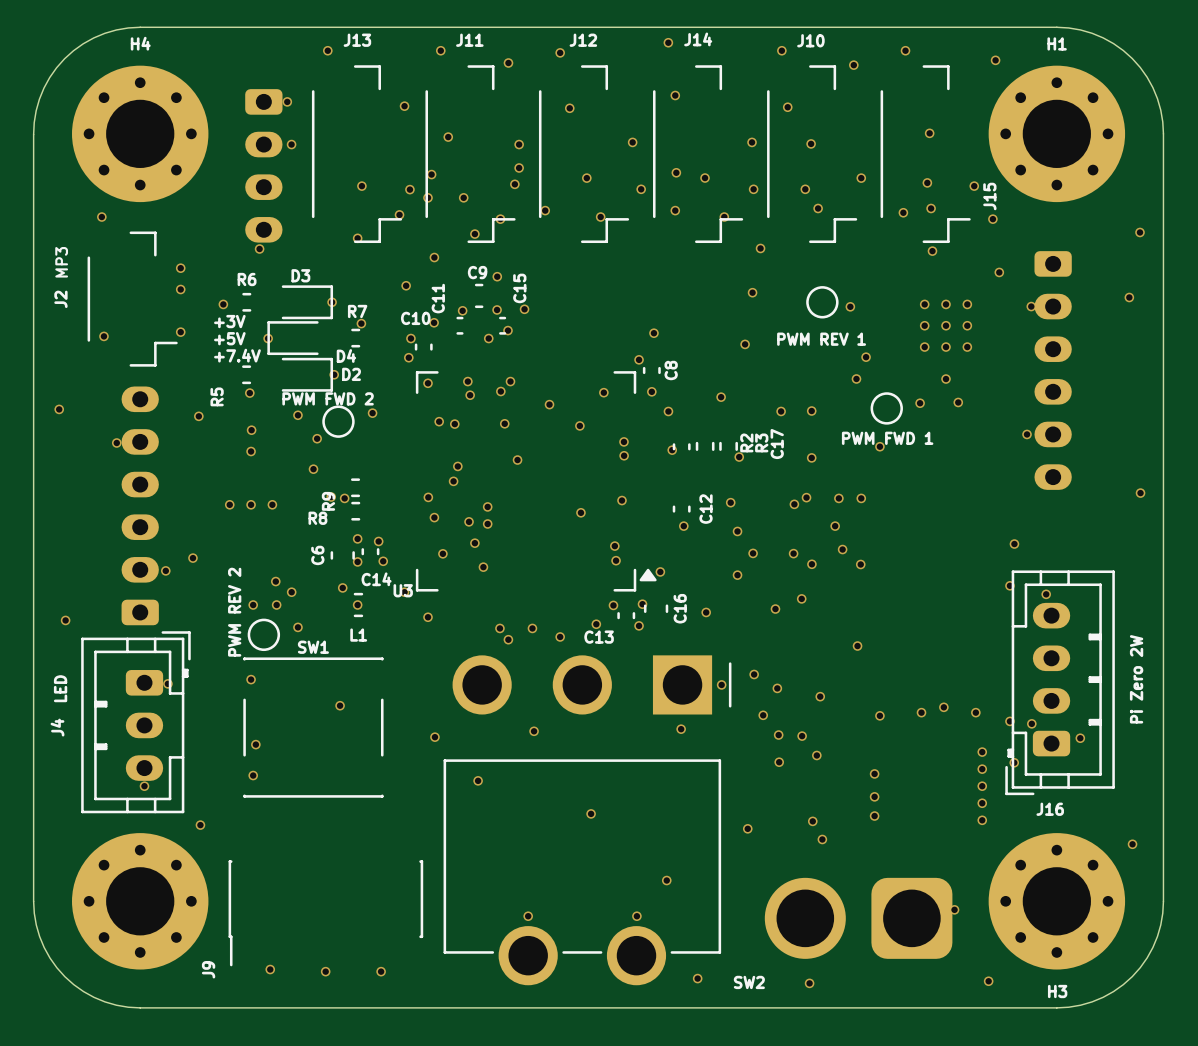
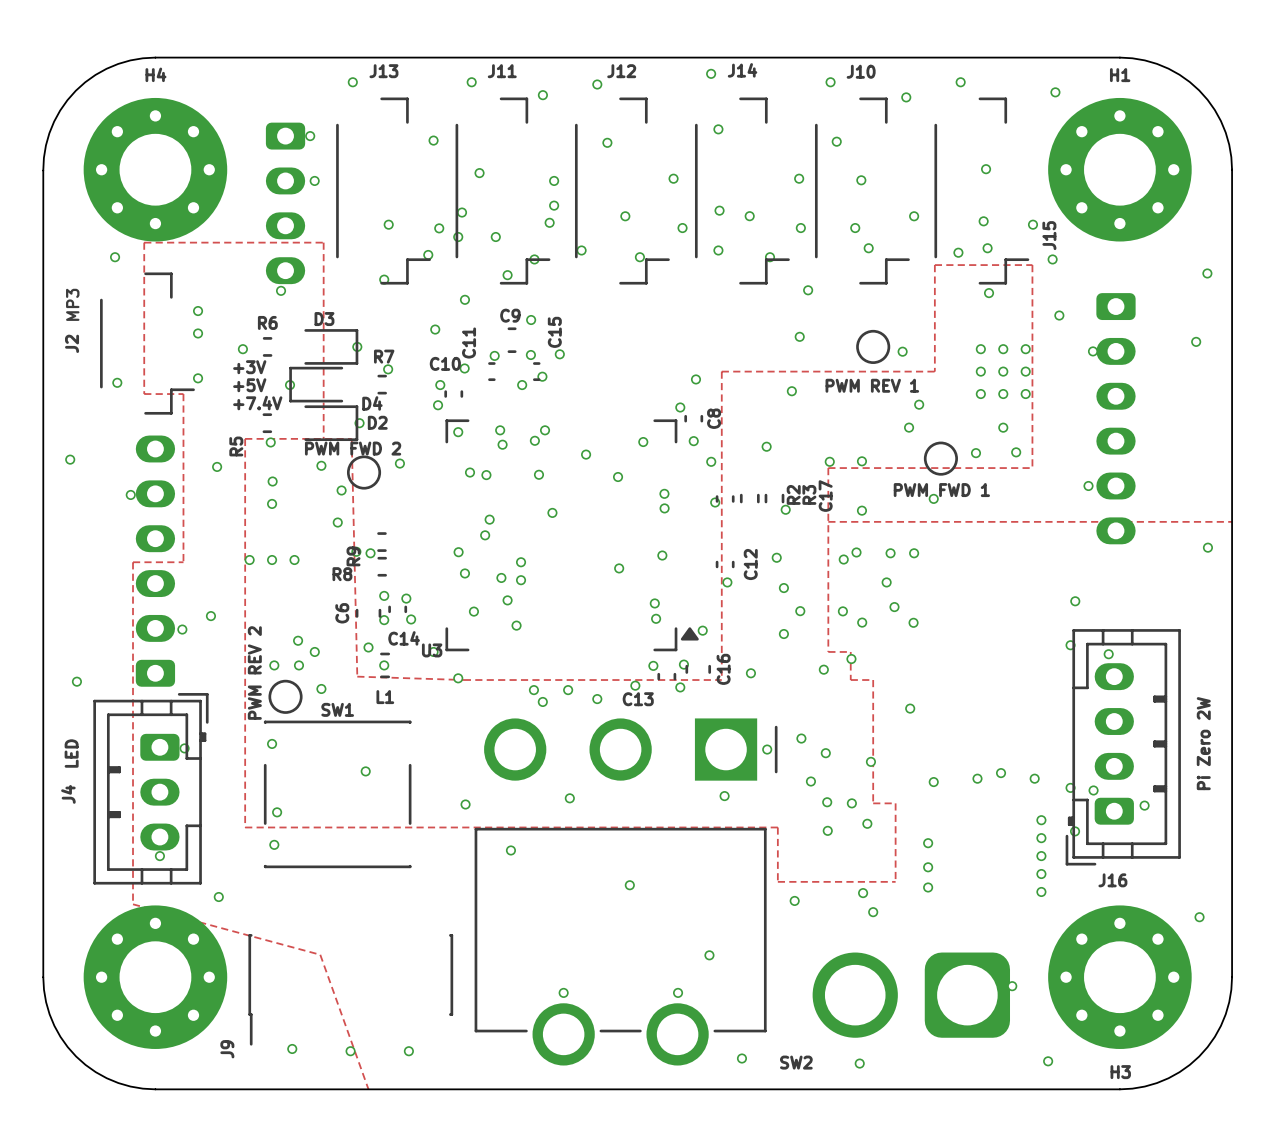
zone outline: none -> (934, 265) (1032, 265) (1032, 468) (828, 468) (828, 651) (850, 651) (850, 680) (873, 680) (873, 803) (895, 803) (895, 881) (777, 881) (777, 827) (245, 827) (245, 438) (351, 438) (357, 676) (463, 680) (721, 680) (721, 371) (934, 371) (934, 265)
zone outline: none -> (323, 438) (323, 242) (144, 242) (144, 394) (183, 394) (183, 562) (133, 562) (133, 904) (320, 954) (368, 1089)
zone outline: none -> (828, 521) (1232, 521)

